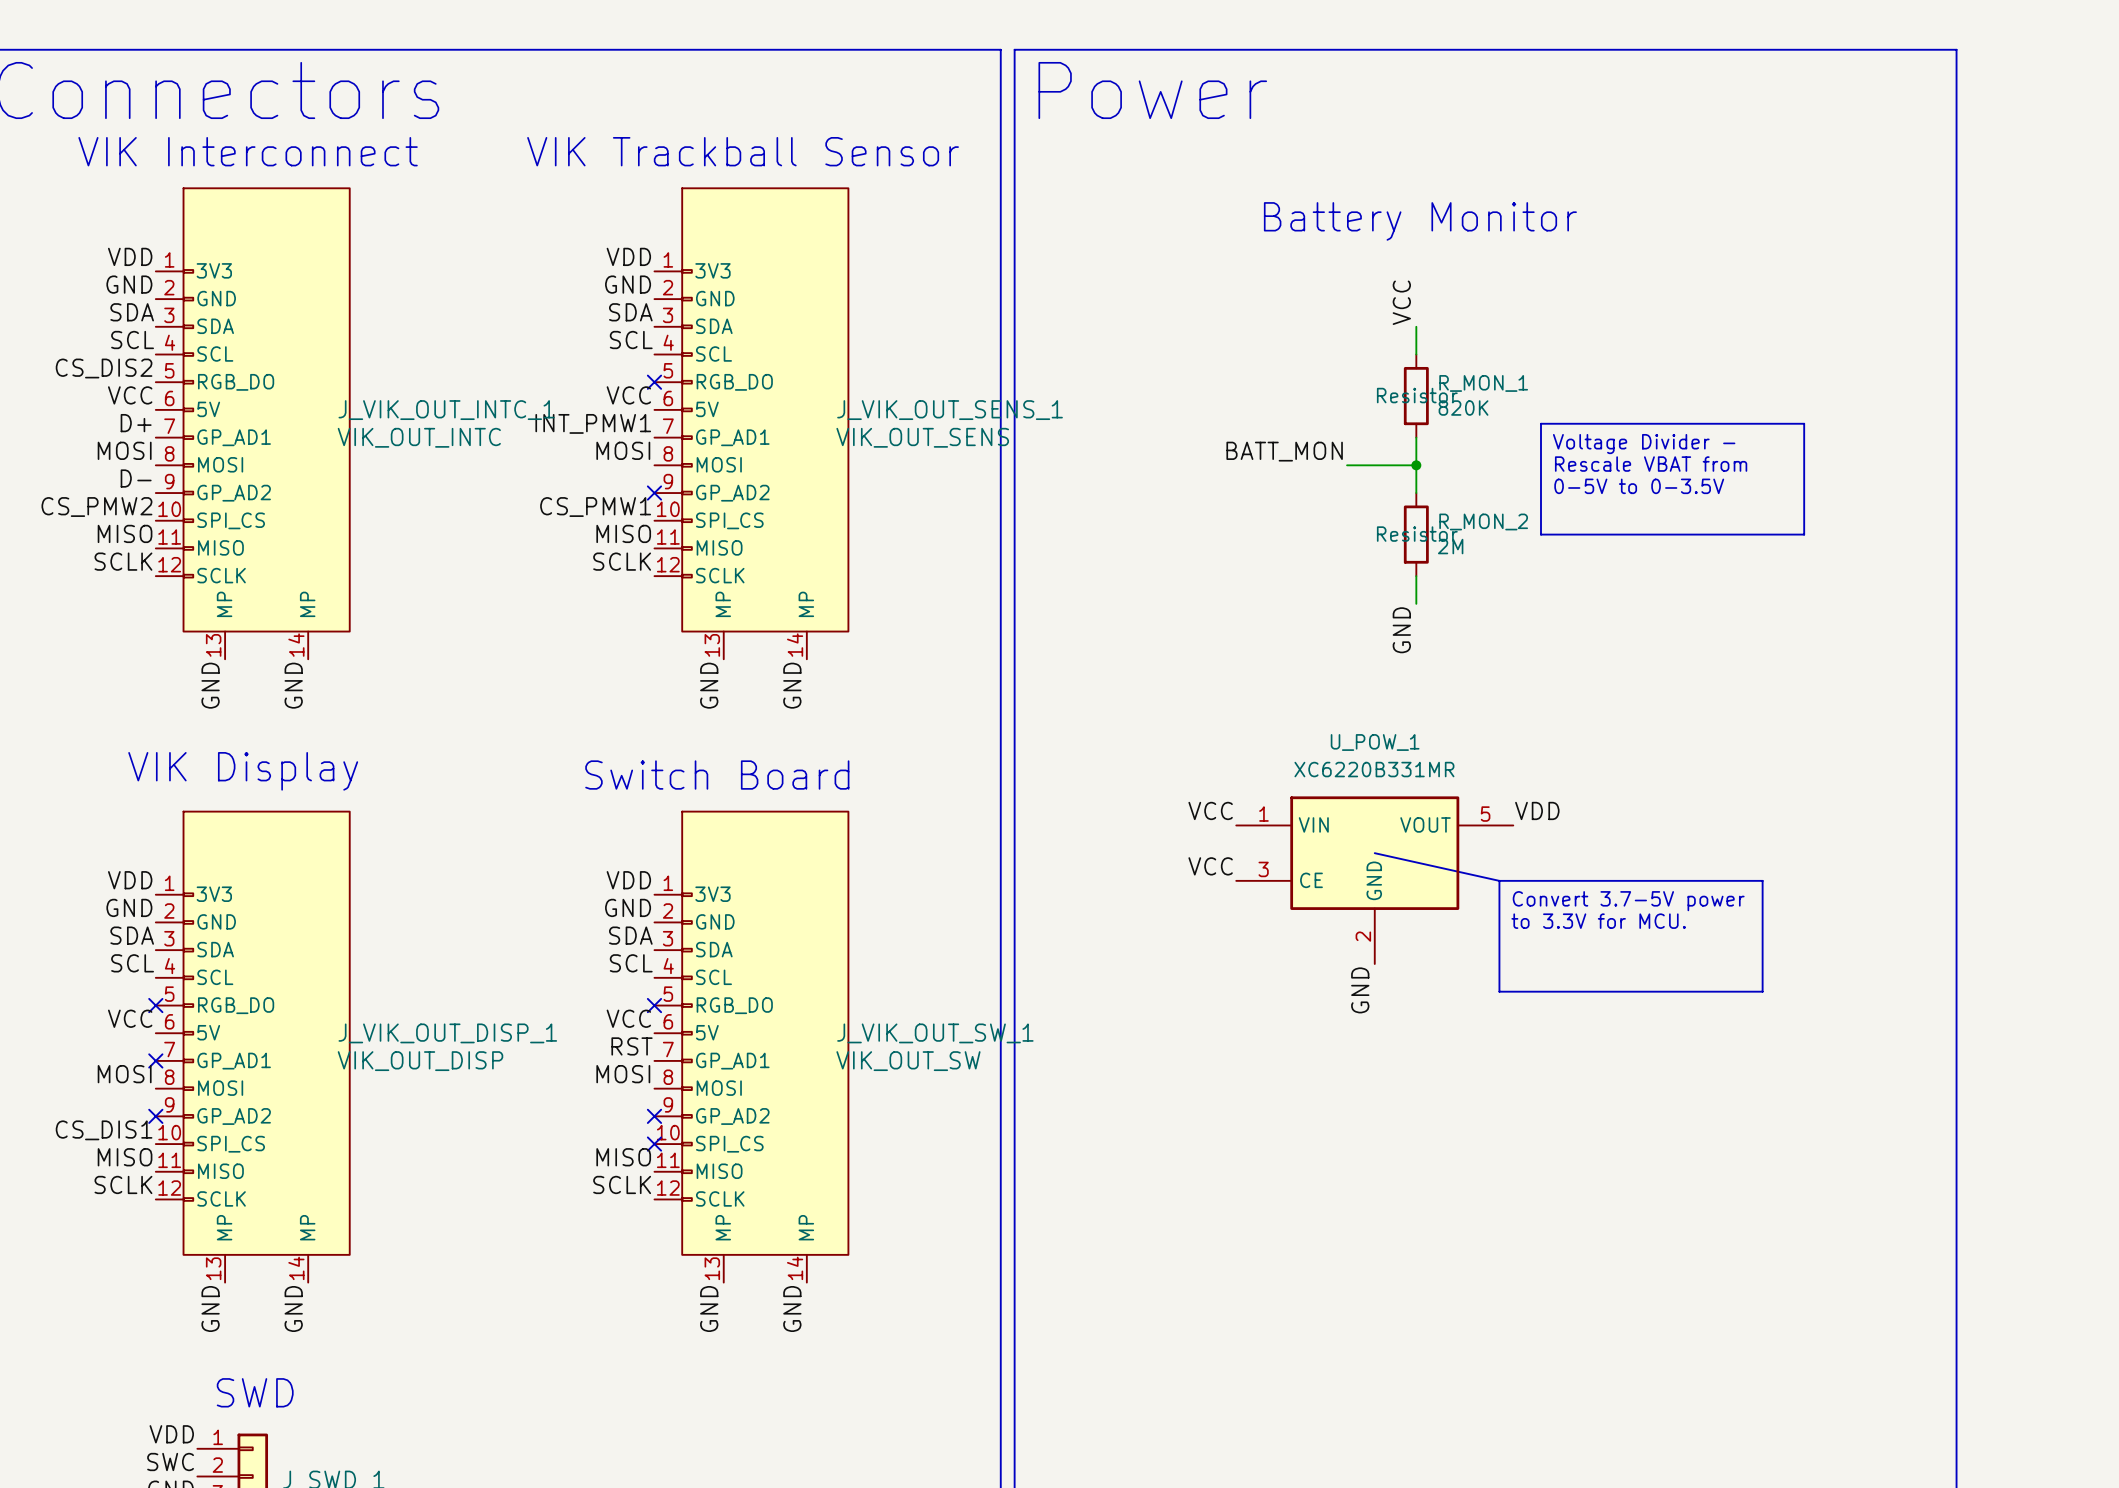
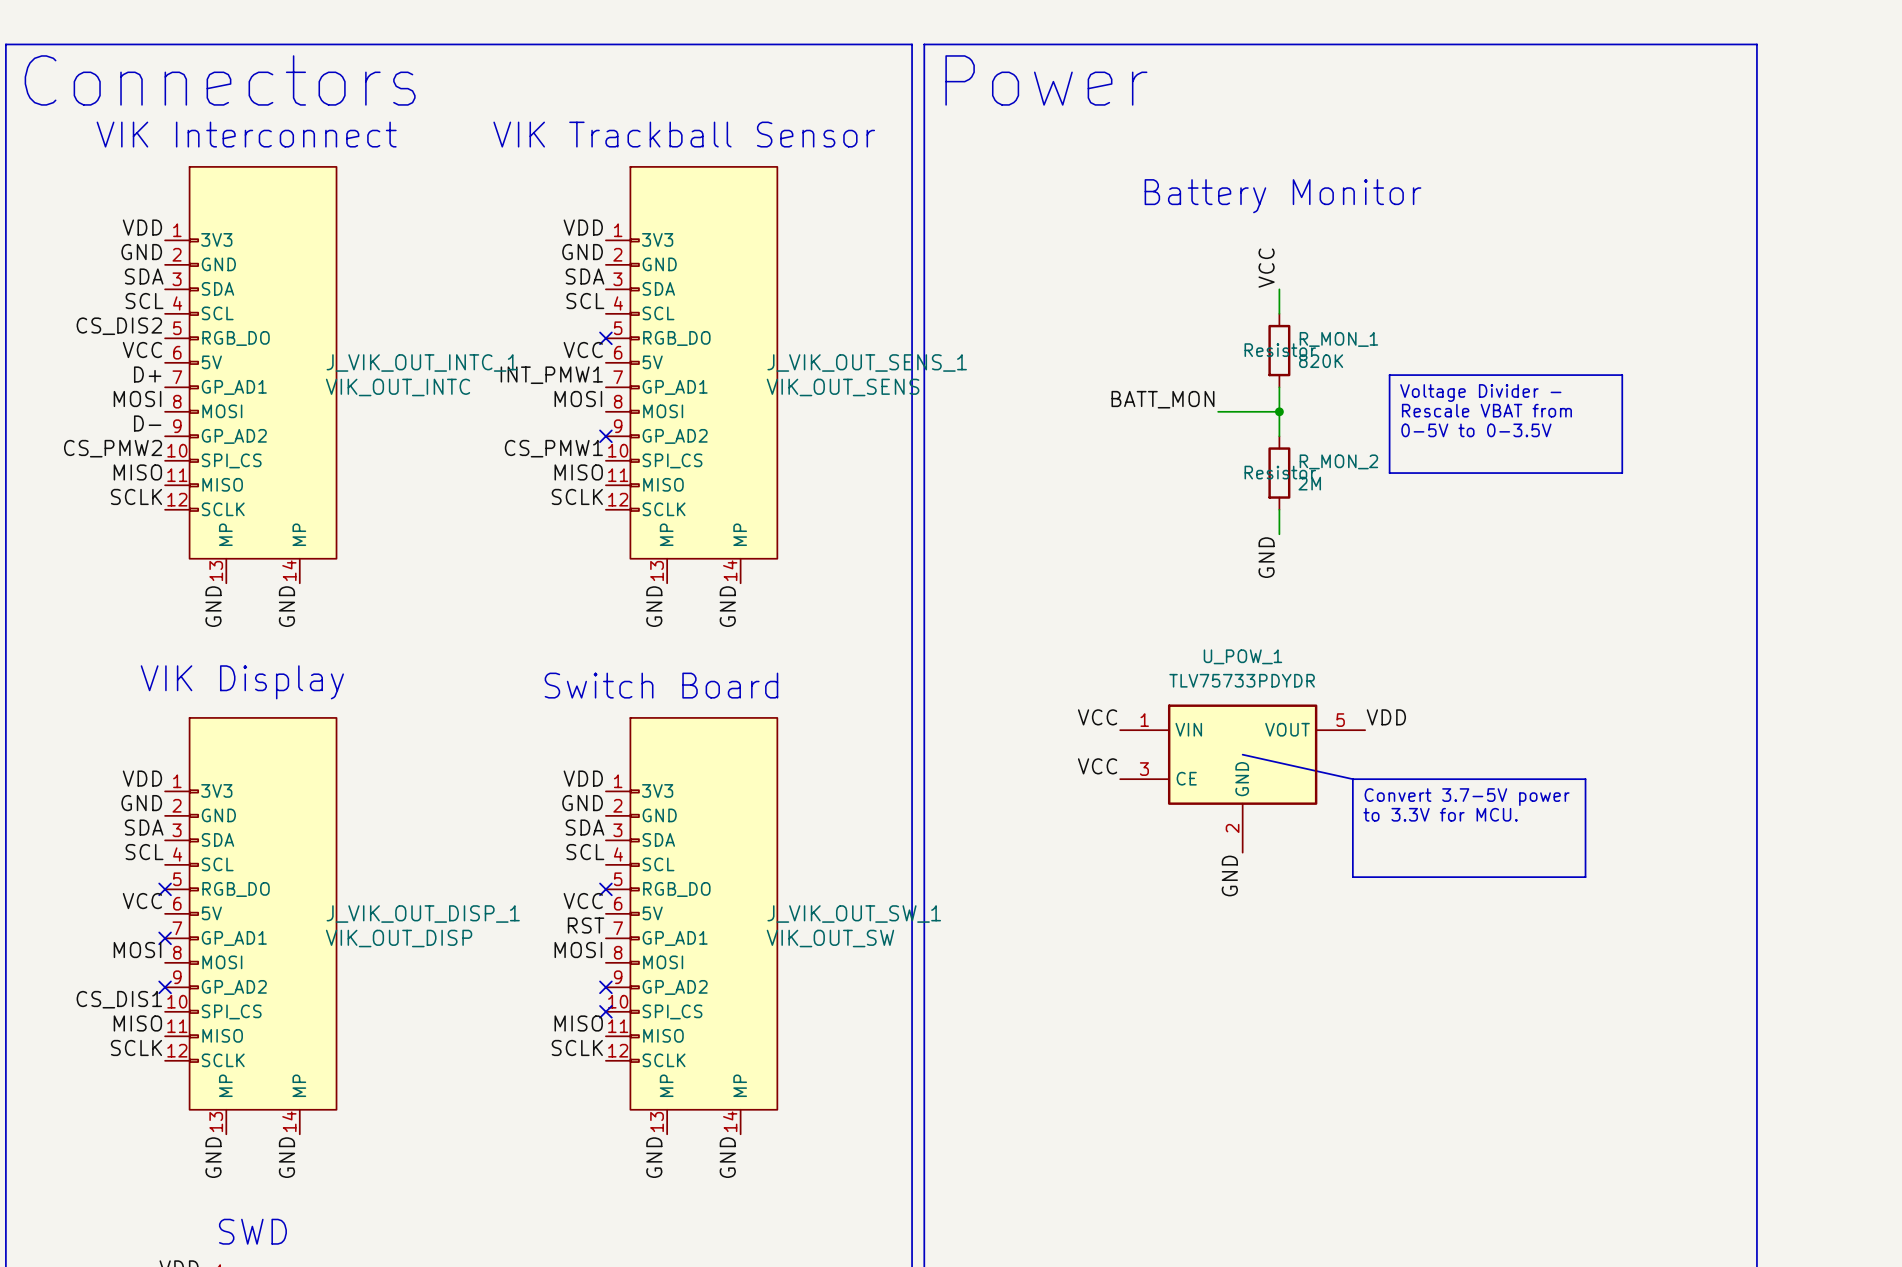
U_POW_1 value: XC6220B331MR (1374, 769) -> TLV75733PDYDR (1242, 680)

